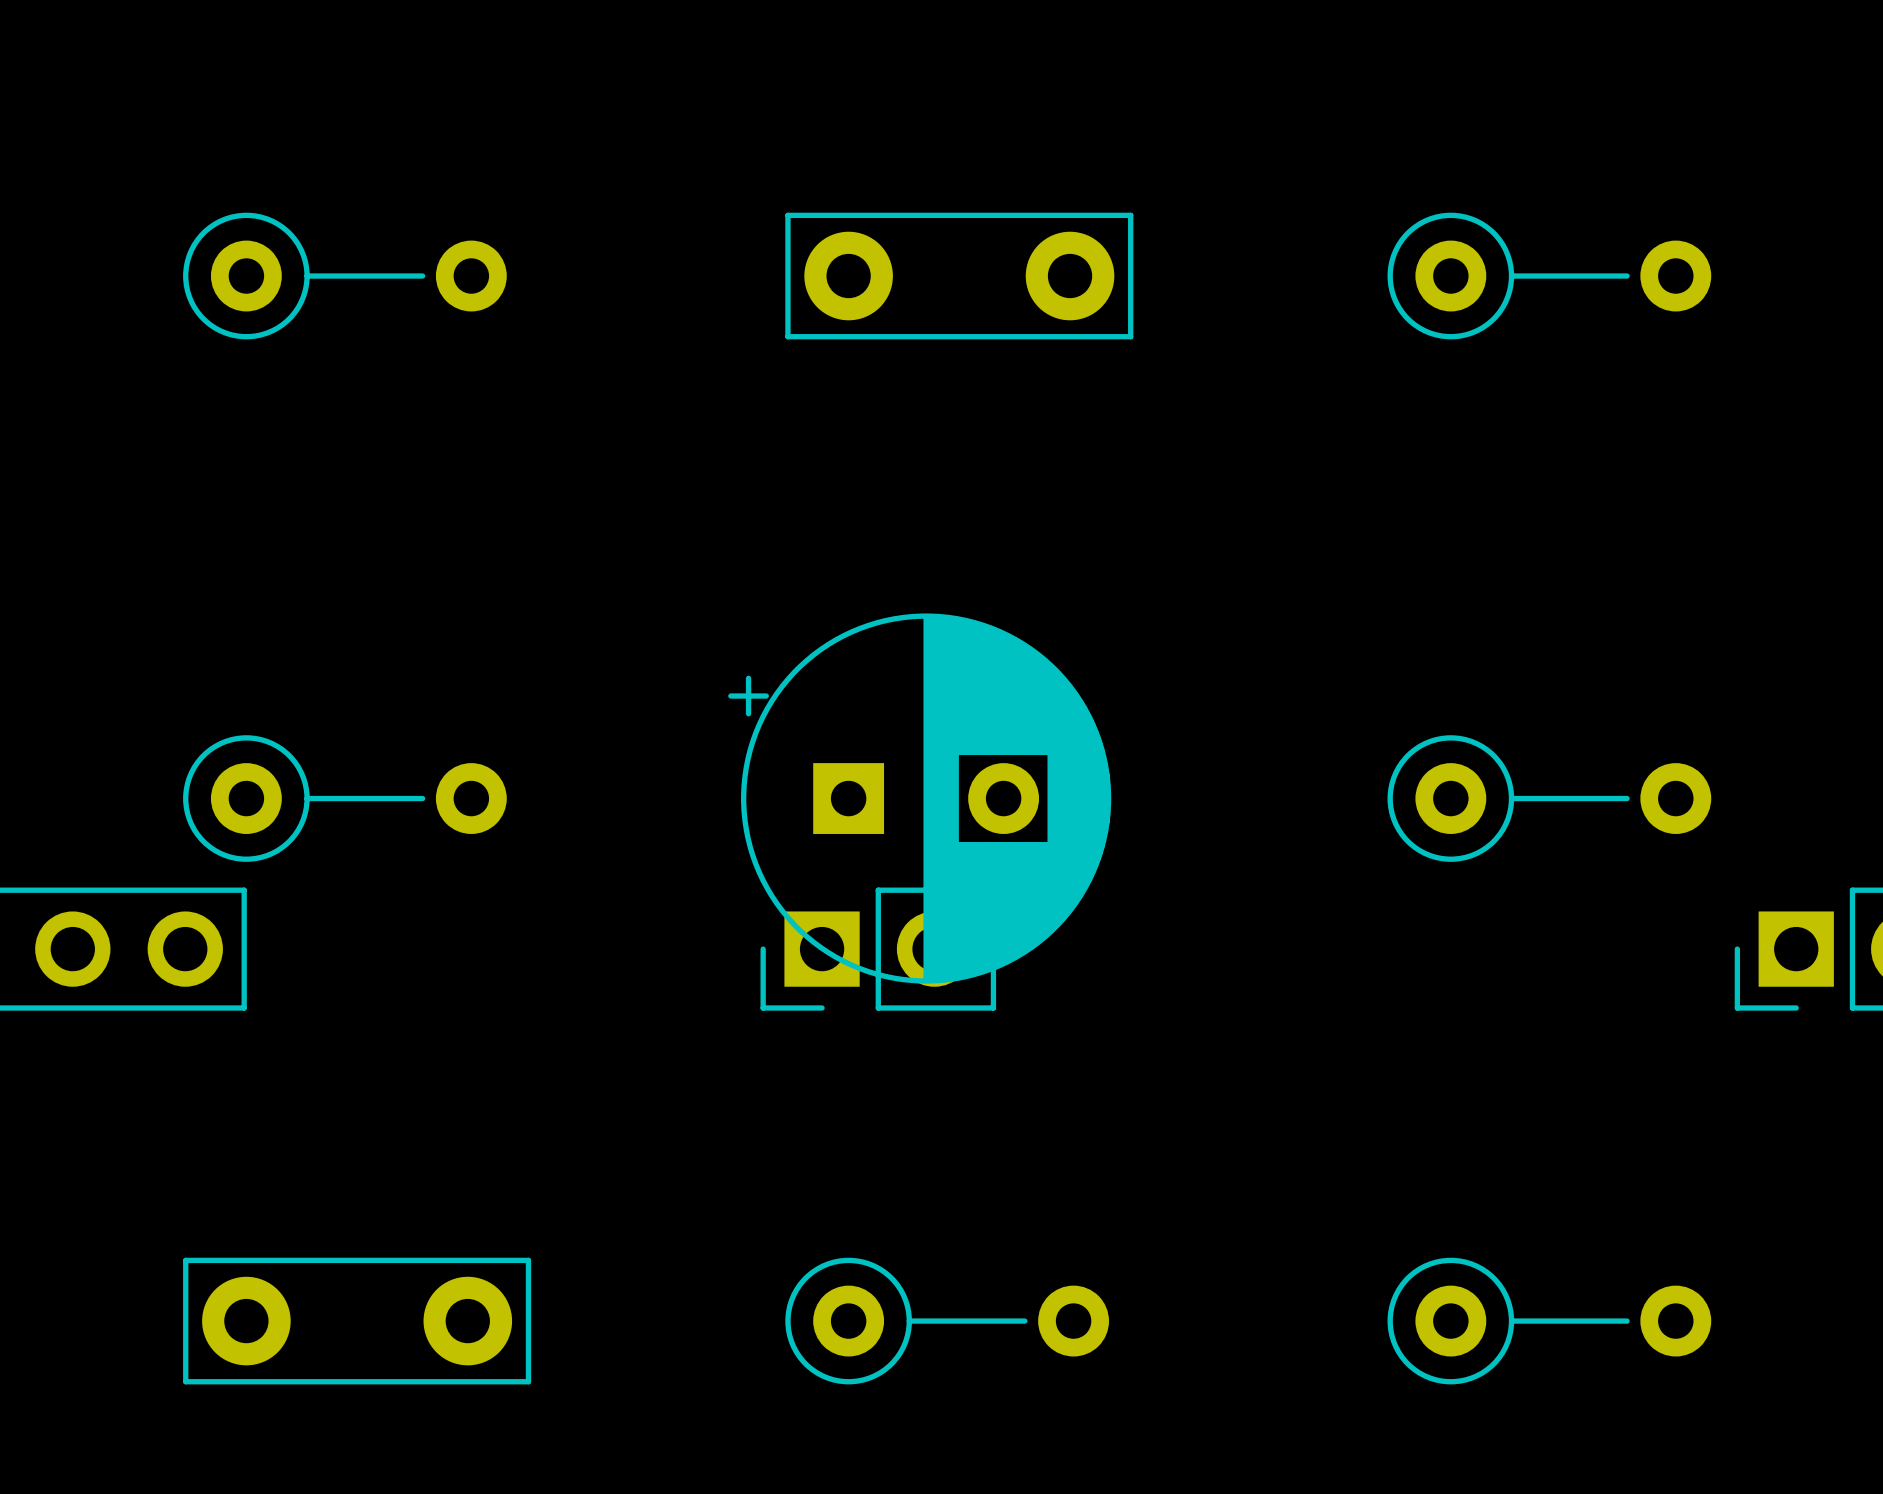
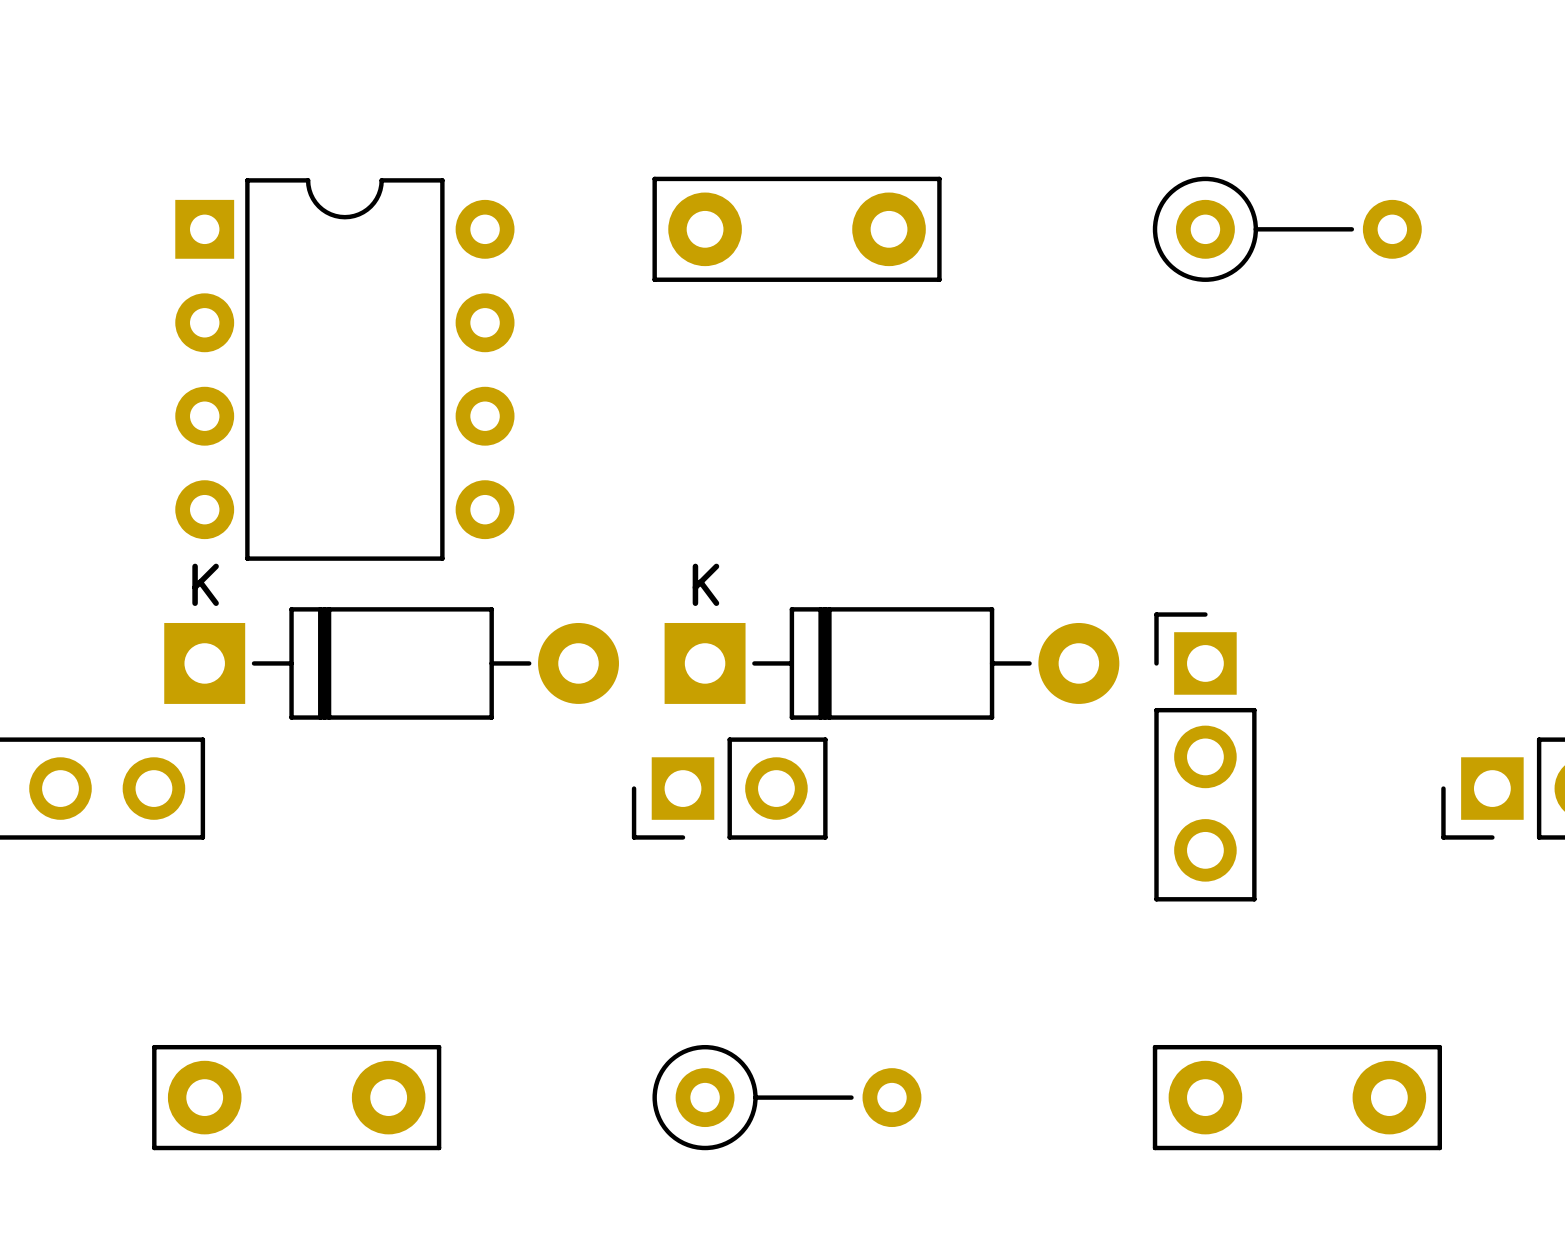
part: (344, 276) -> none
part: none -> (344, 369)
part: (344, 798) -> none
part: none -> (391, 663)
part: (919, 798) -> none
part: none -> (891, 663)
part: (1549, 798) -> none
part: none -> (1205, 756)
part footprint: [1387, 1257, 1712, 1385] -> [1152, 1044, 1442, 1151]

